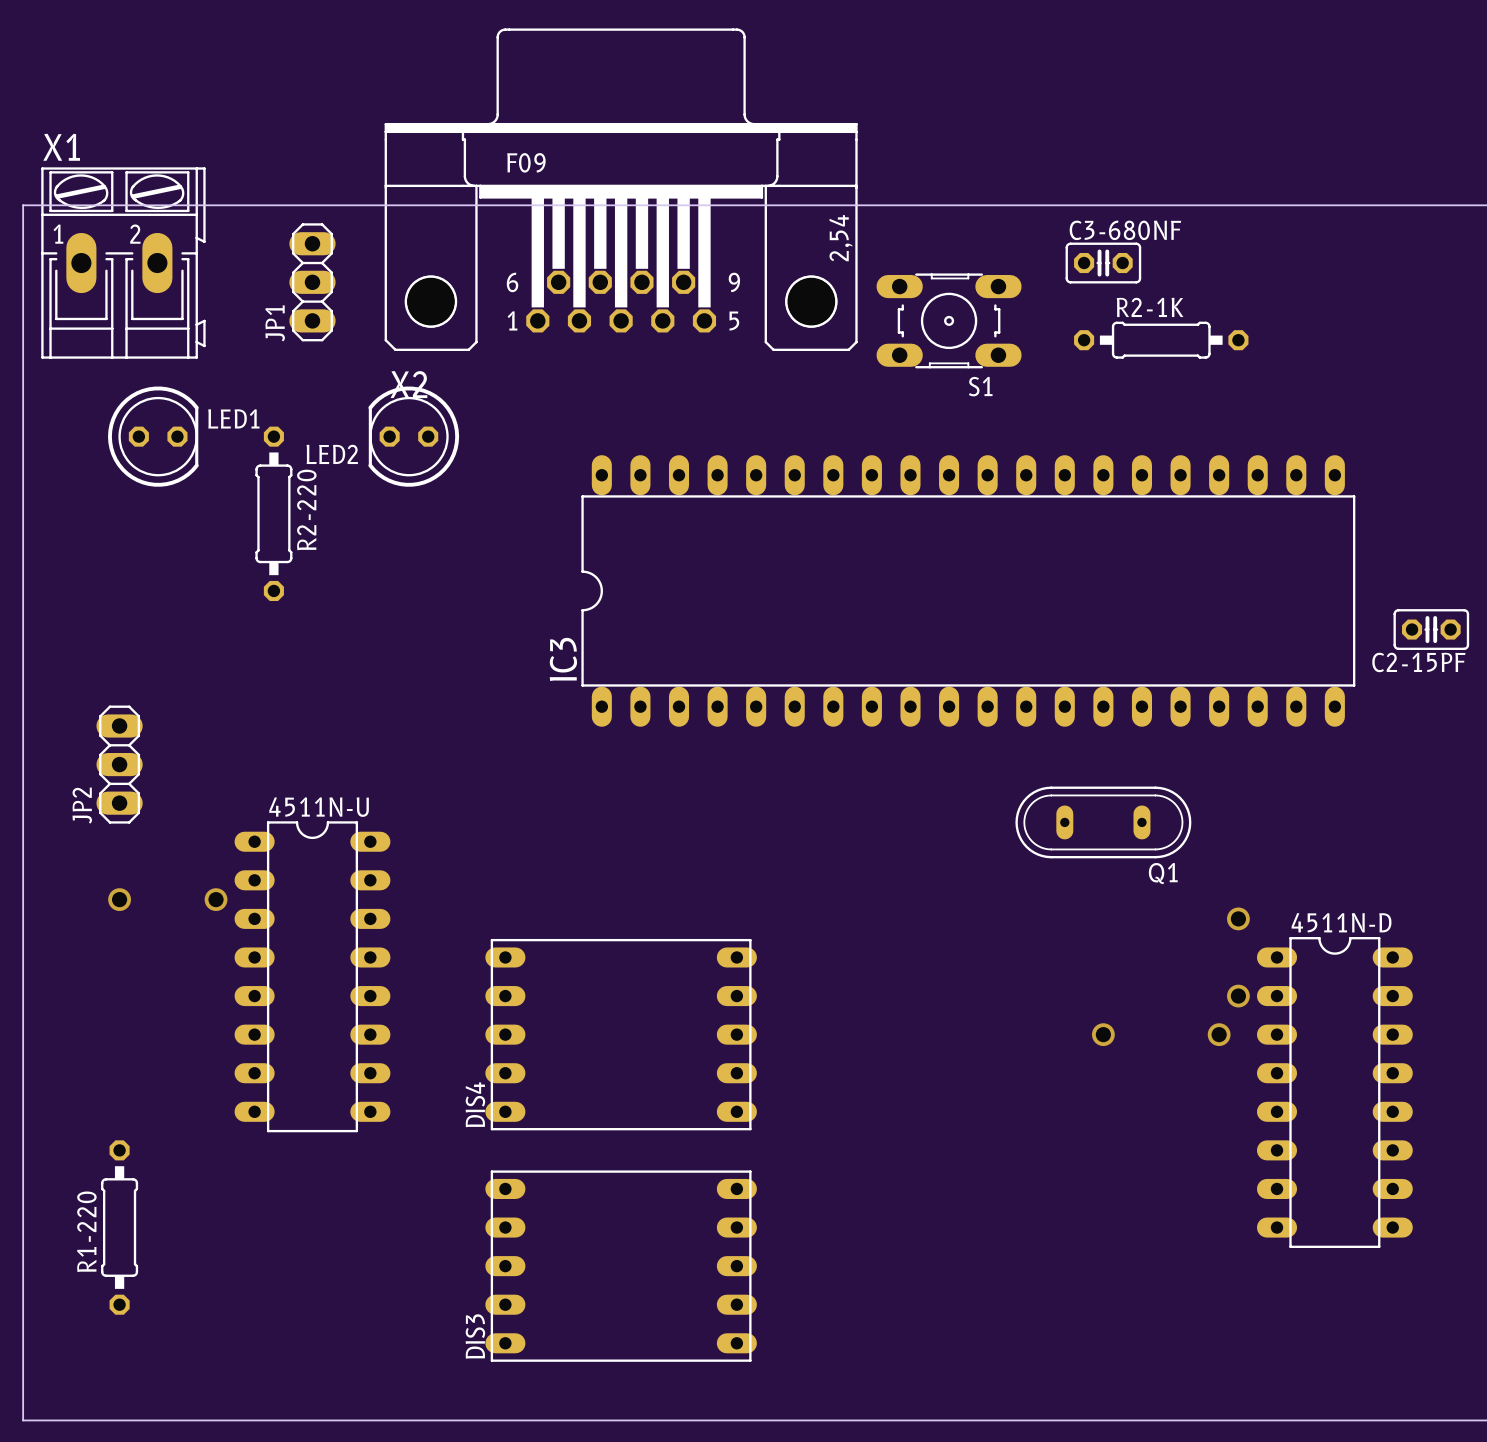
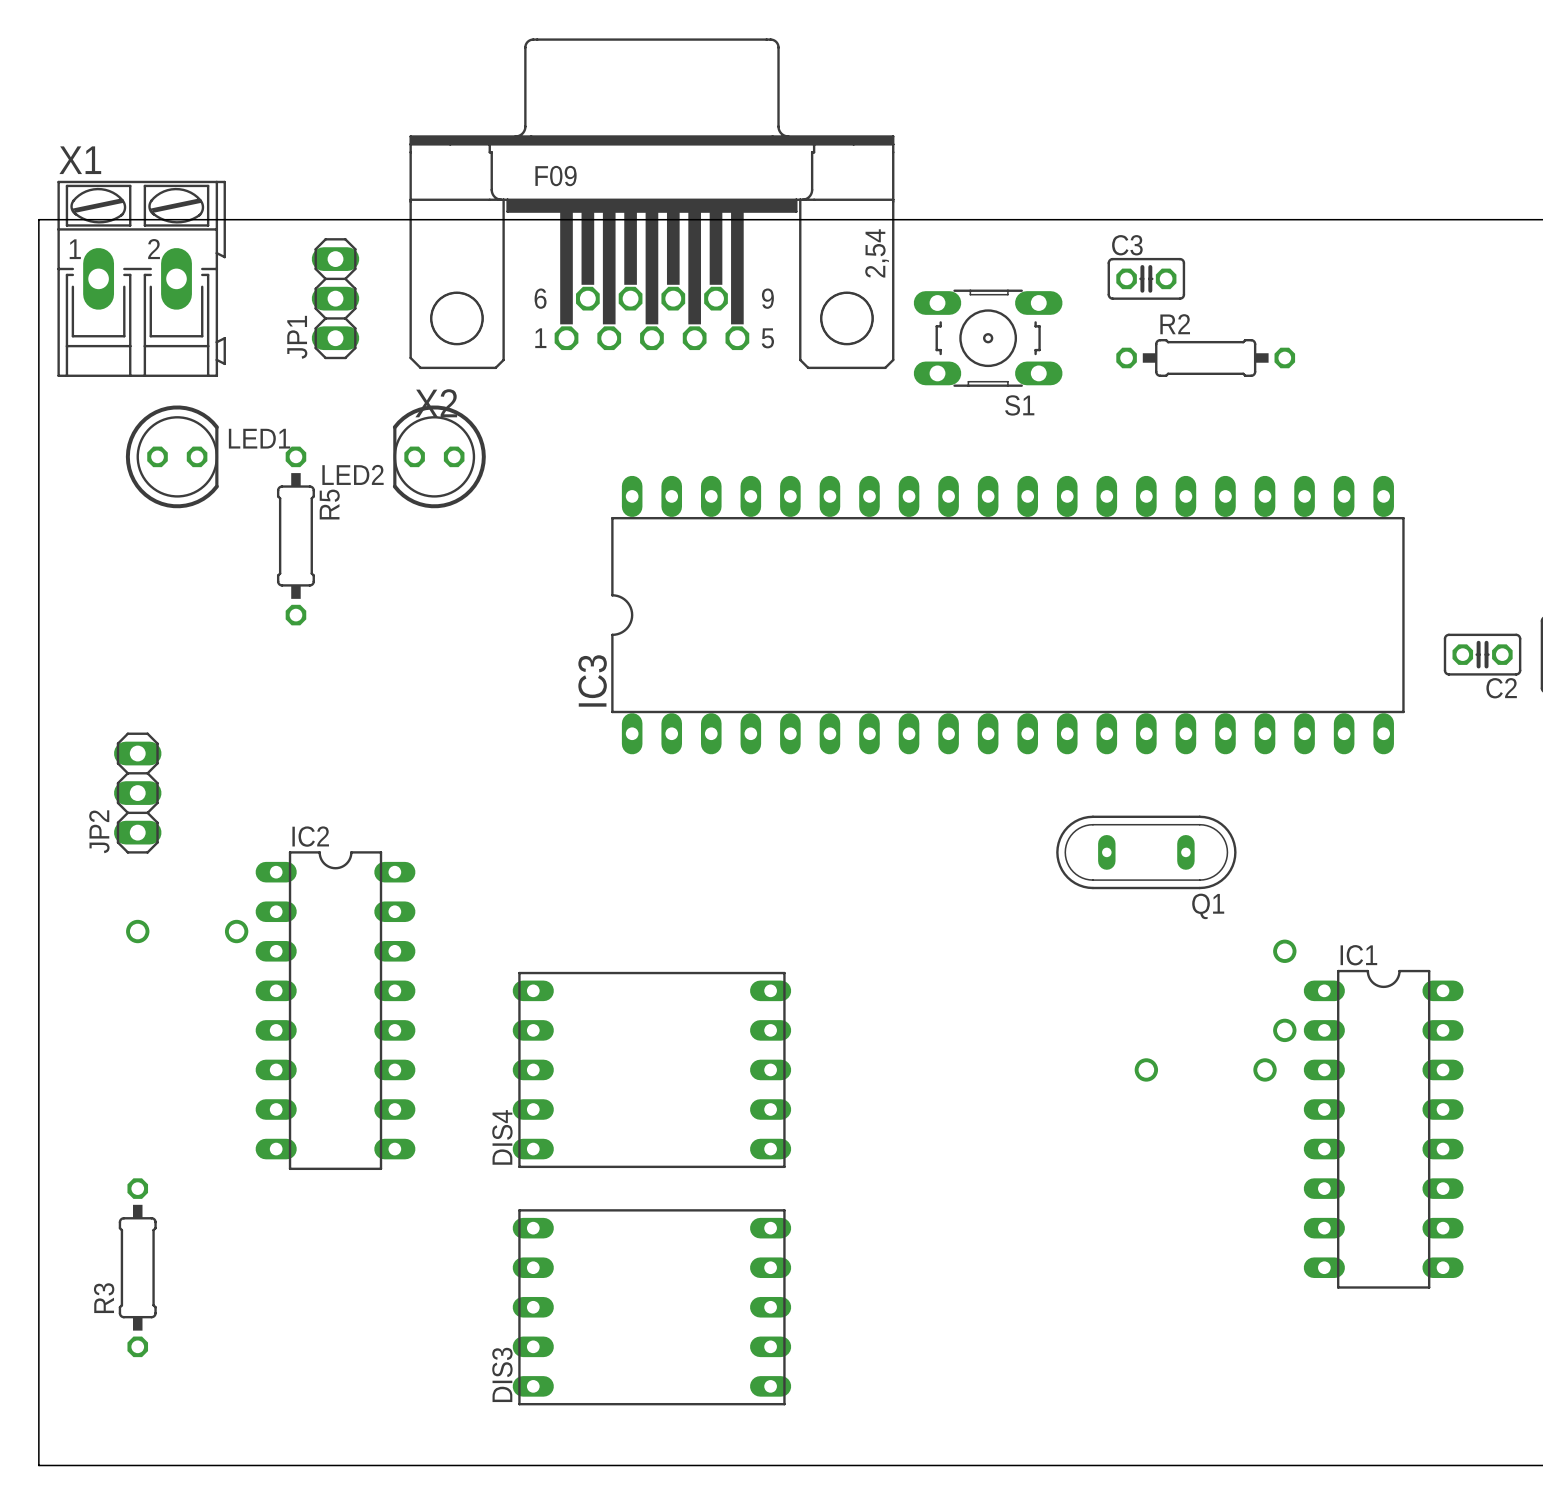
C3-680NF name: C3-680NF (1125, 230) -> C3 (1127, 245)
R2-1K name: R2-1K (1150, 307) -> R2 (1175, 324)
R2-220 name: R2-220 (306, 509) -> R5 (329, 504)
C2-15PF name: C2-15PF (1418, 662) -> C2 (1501, 688)
4511N-U name: 4511N-U (319, 807) -> IC2 (310, 836)
4511N-D name: 4511N-D (1341, 922) -> IC1 (1358, 955)
R1-220 name: R1-220 (86, 1231) -> R3 (104, 1298)

